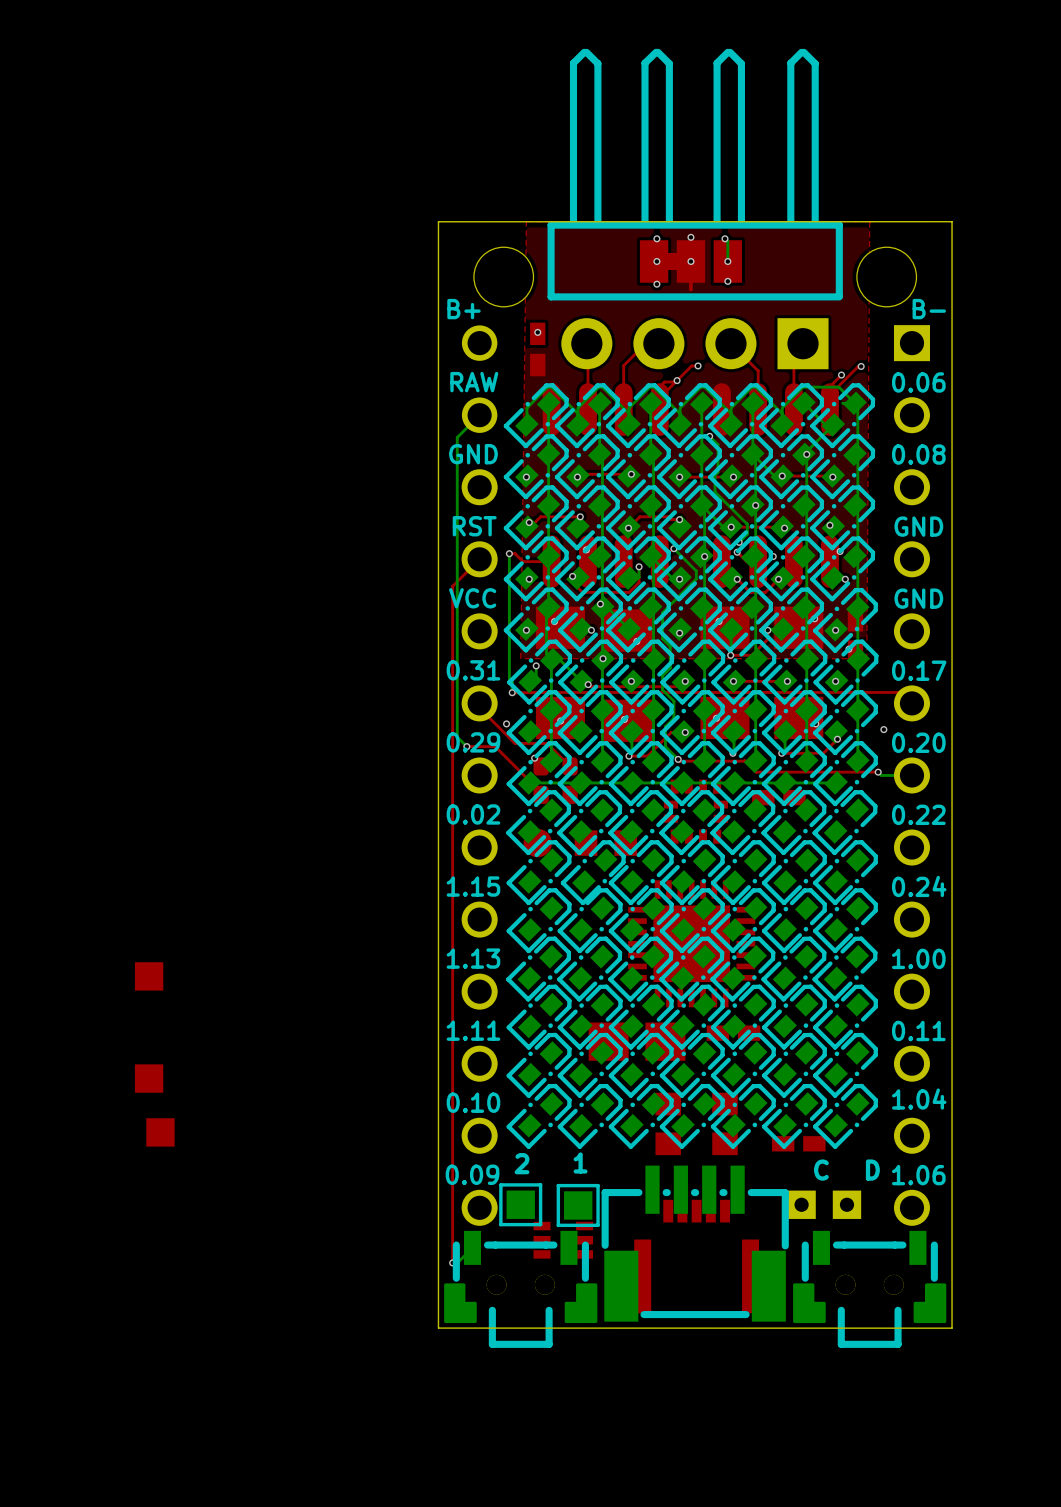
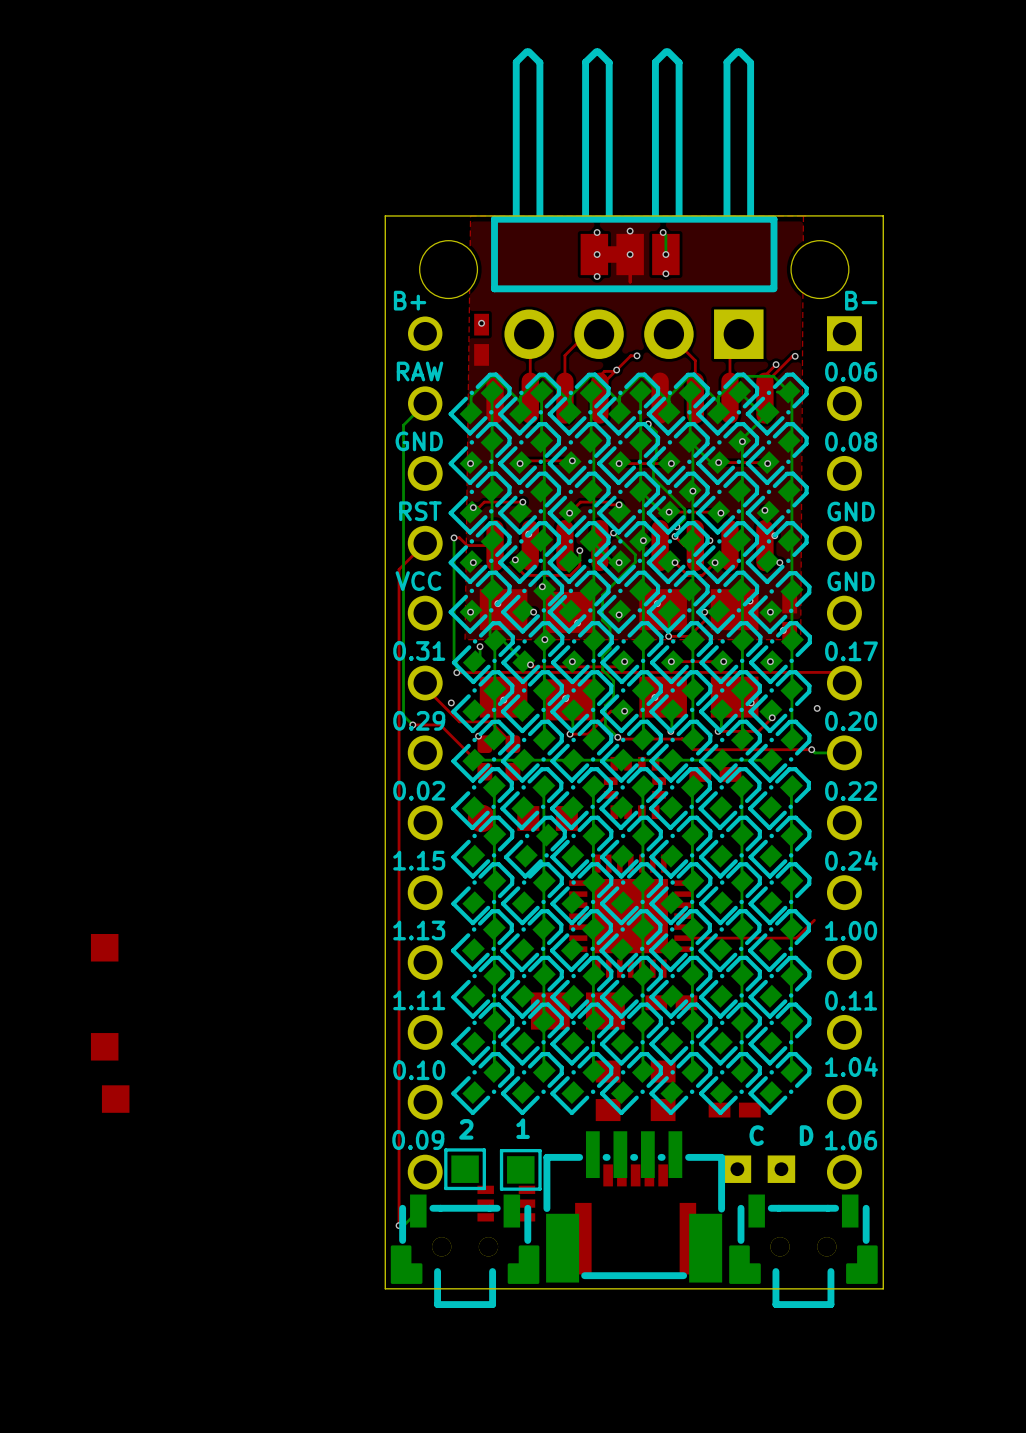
bottom track: none -> (494, 786) (494, 1071)
bottom track: none -> (543, 786) (544, 1071)
bottom track: none -> (593, 786) (593, 1071)
bottom track: none -> (642, 786) (643, 1071)
bottom track: none -> (692, 786) (692, 1071)
bottom track: none -> (741, 786) (742, 1071)
bottom track: none -> (791, 786) (791, 1071)
top track: none -> (814, 920) (796, 938) (683, 938)

